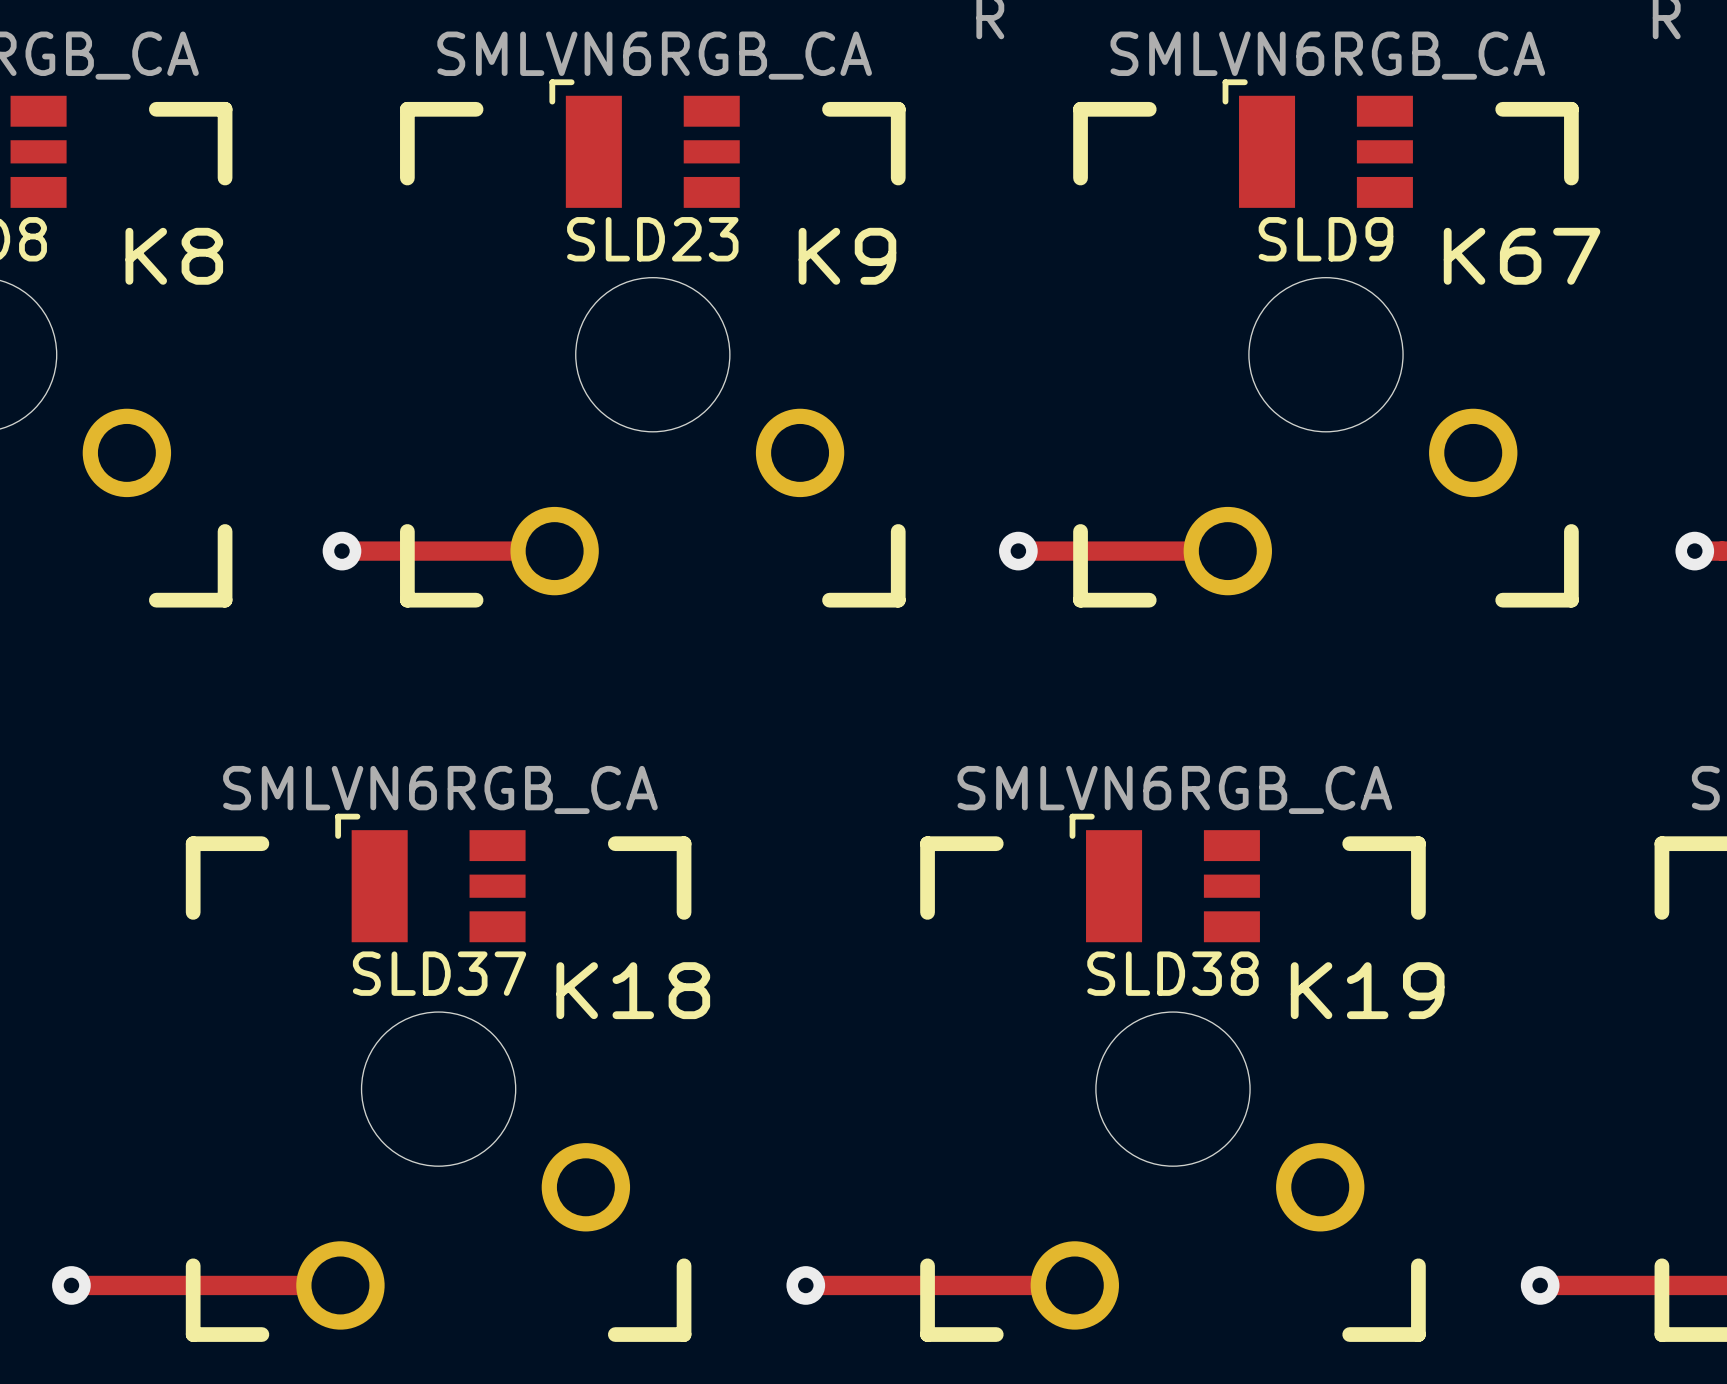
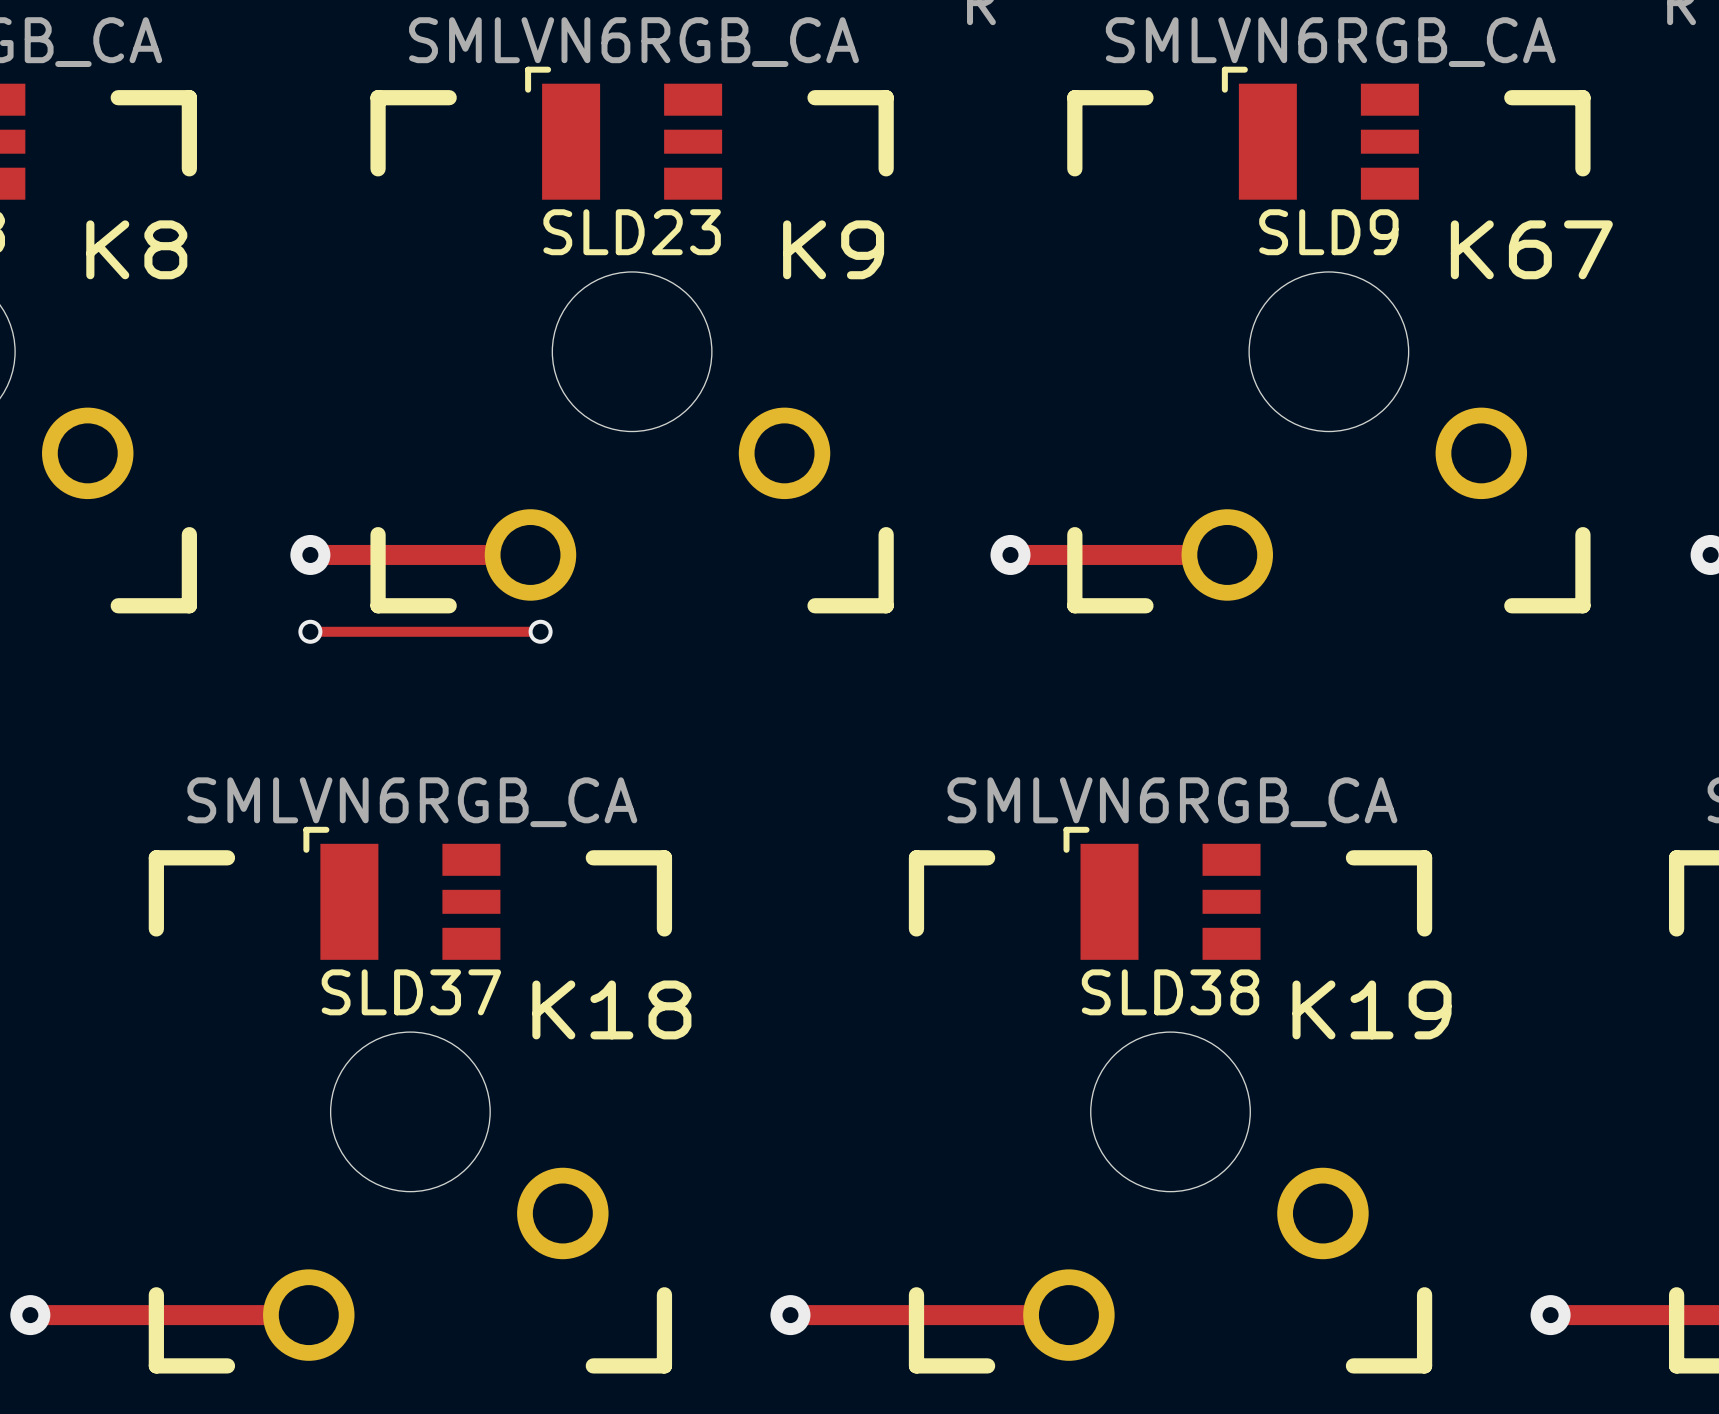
track: none -> (310, 631) (540, 631)
via: none -> (310, 631)
via: none -> (540, 631)

